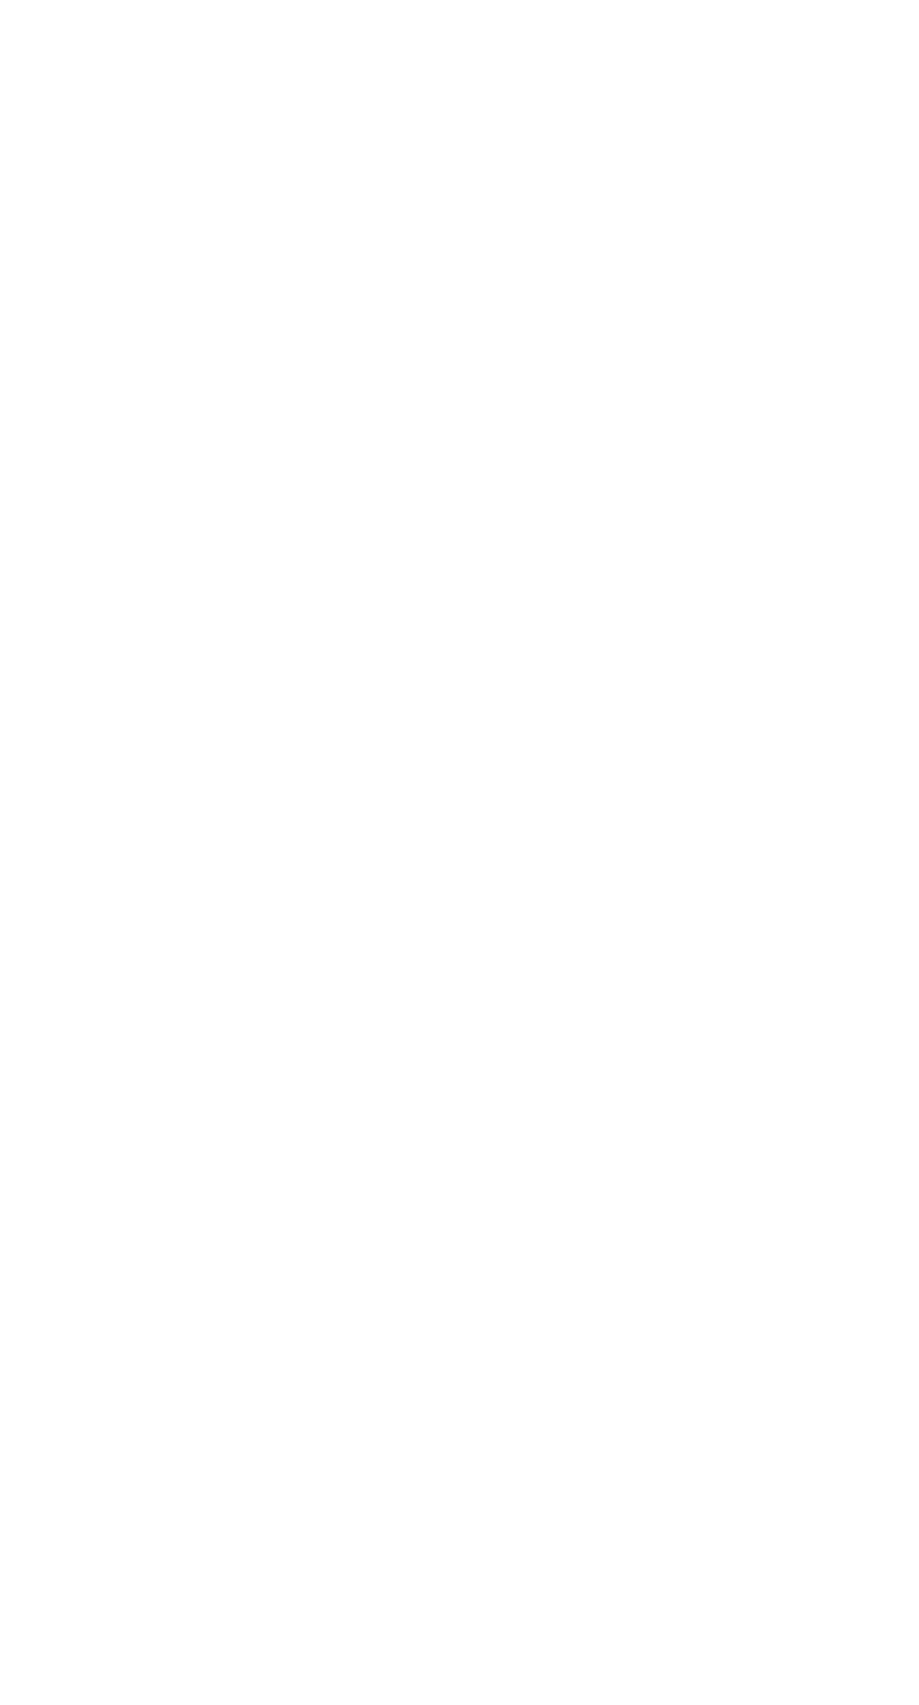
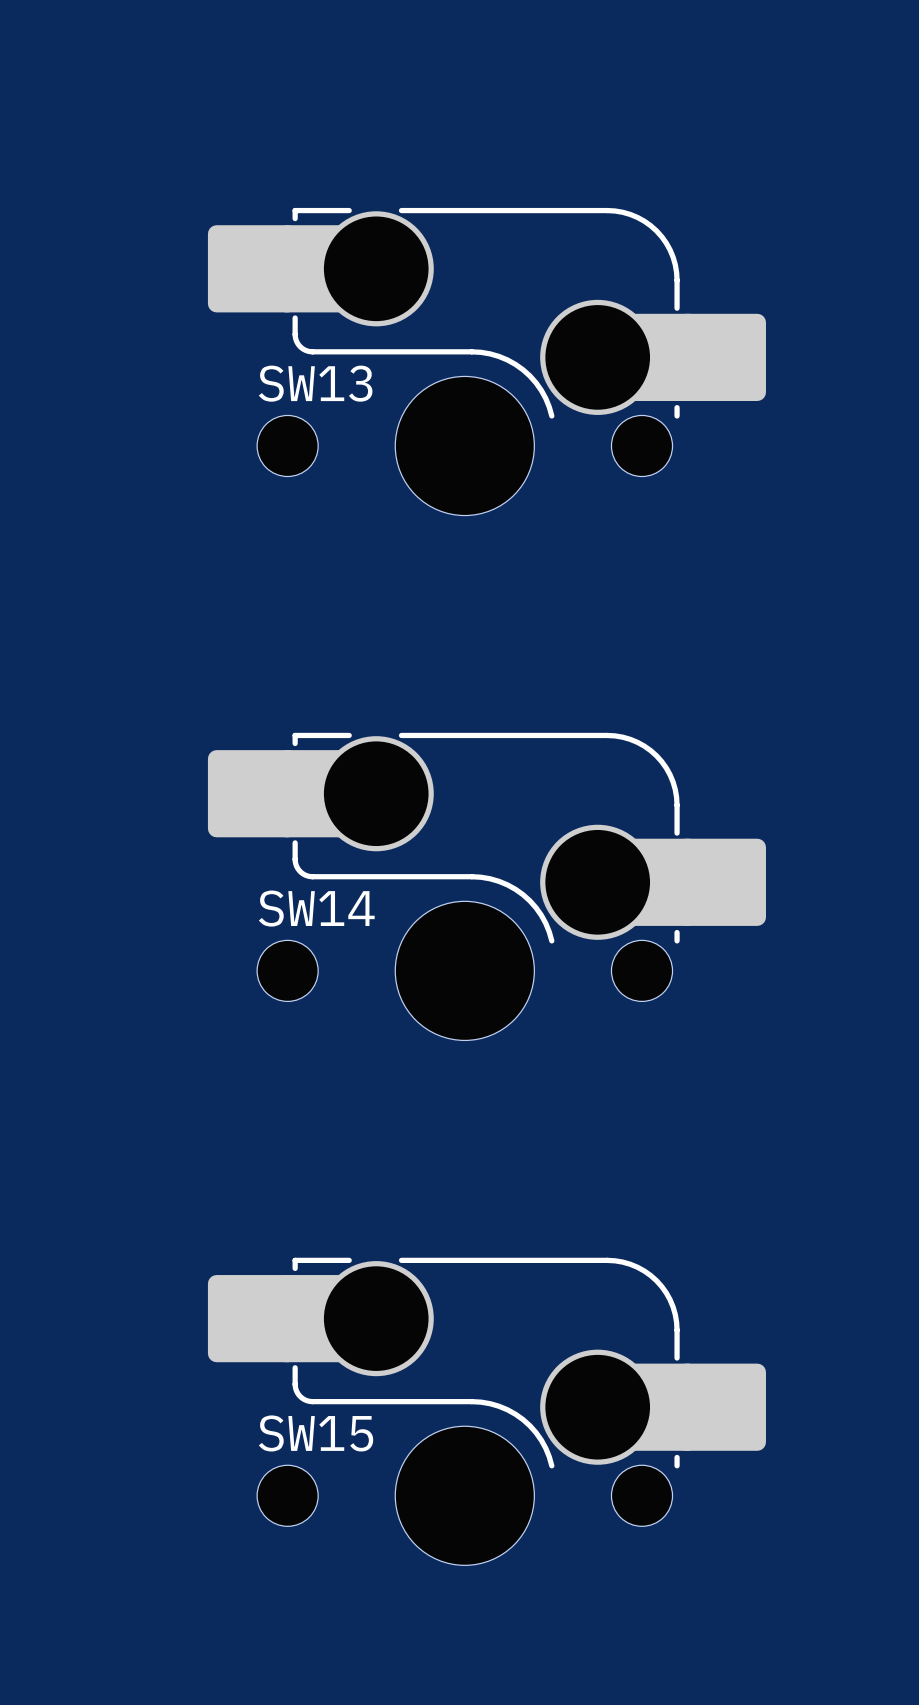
SW13: none -> (486, 361)
SW14: none -> (486, 886)
SW15: none -> (486, 1411)

